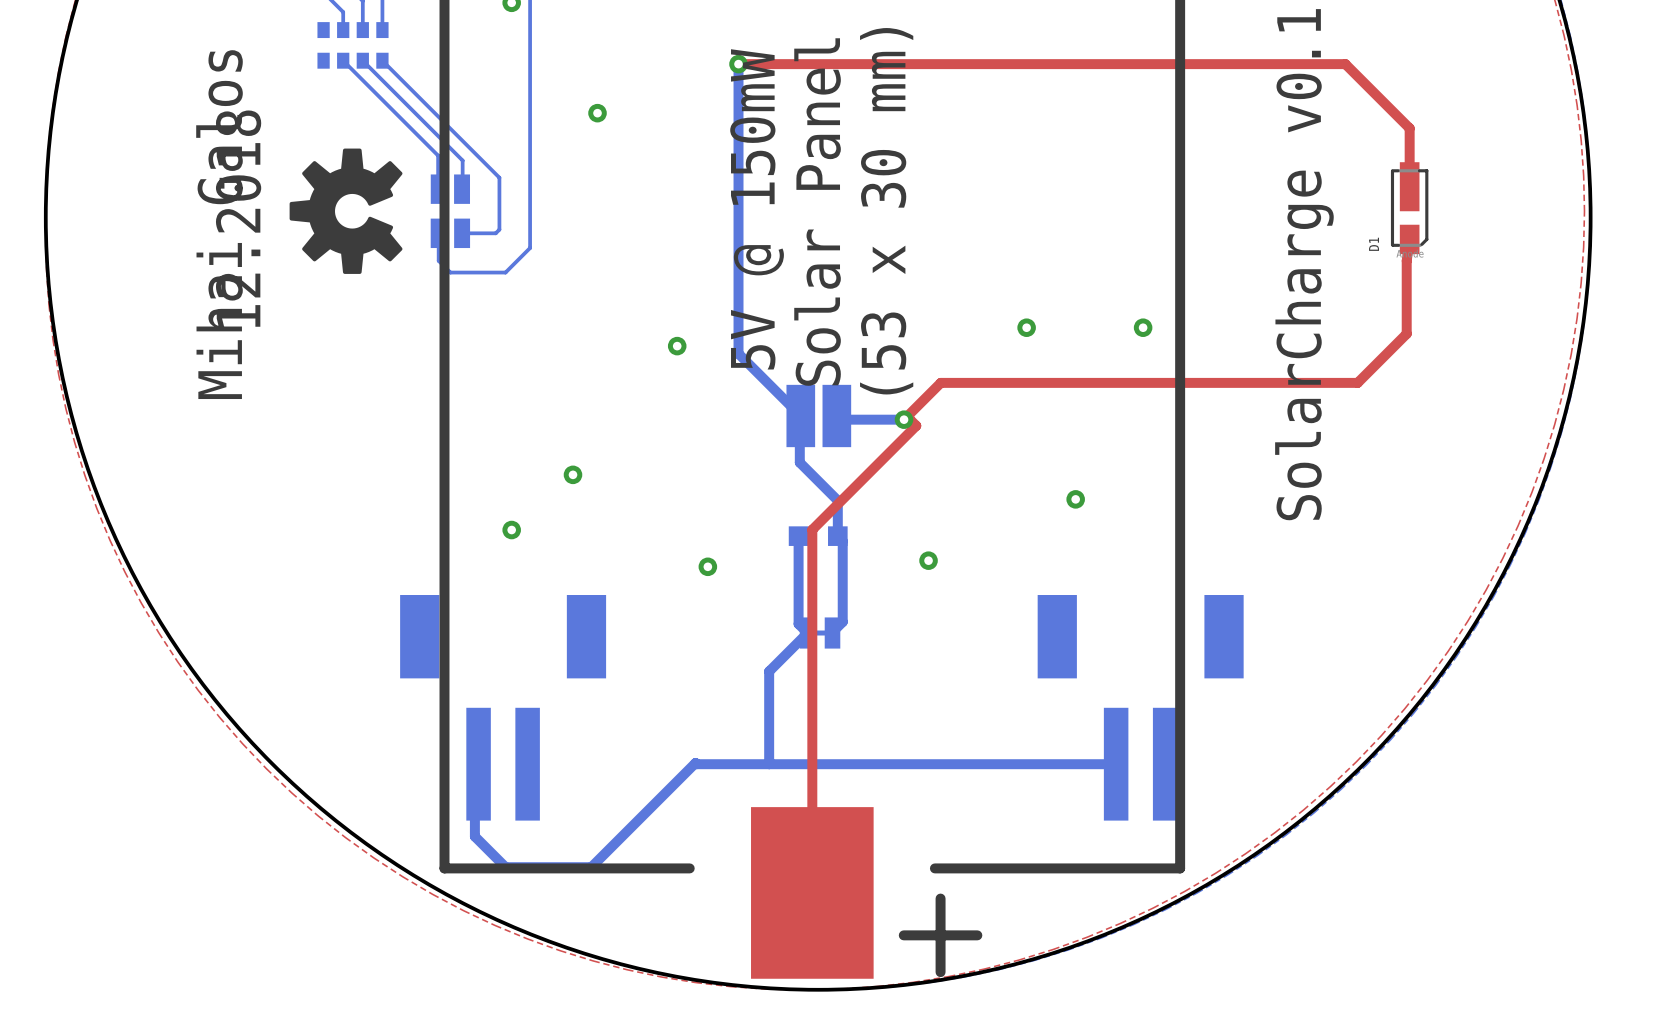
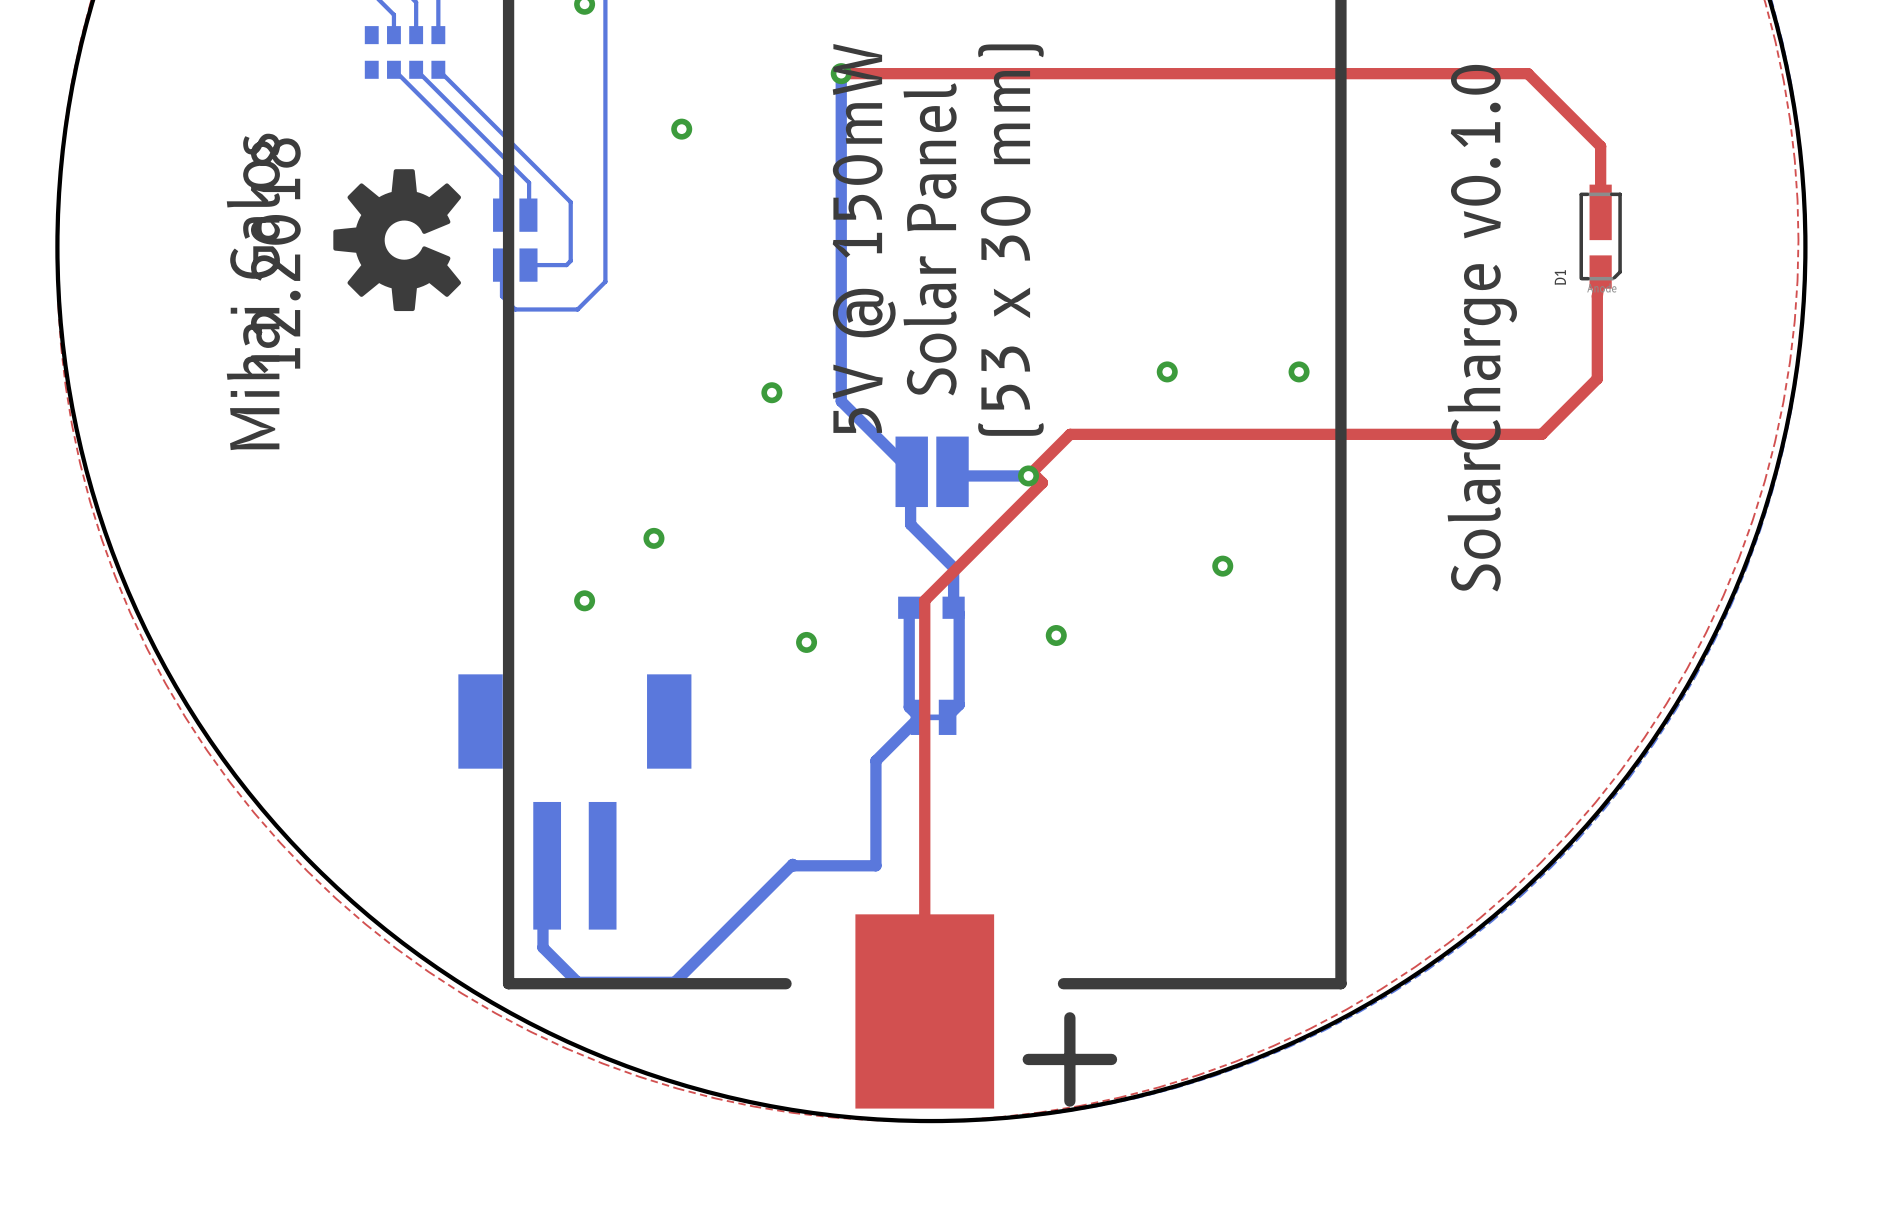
part: (1140, 707) -> none
bottom track: (769, 764) (1116, 764) -> none

